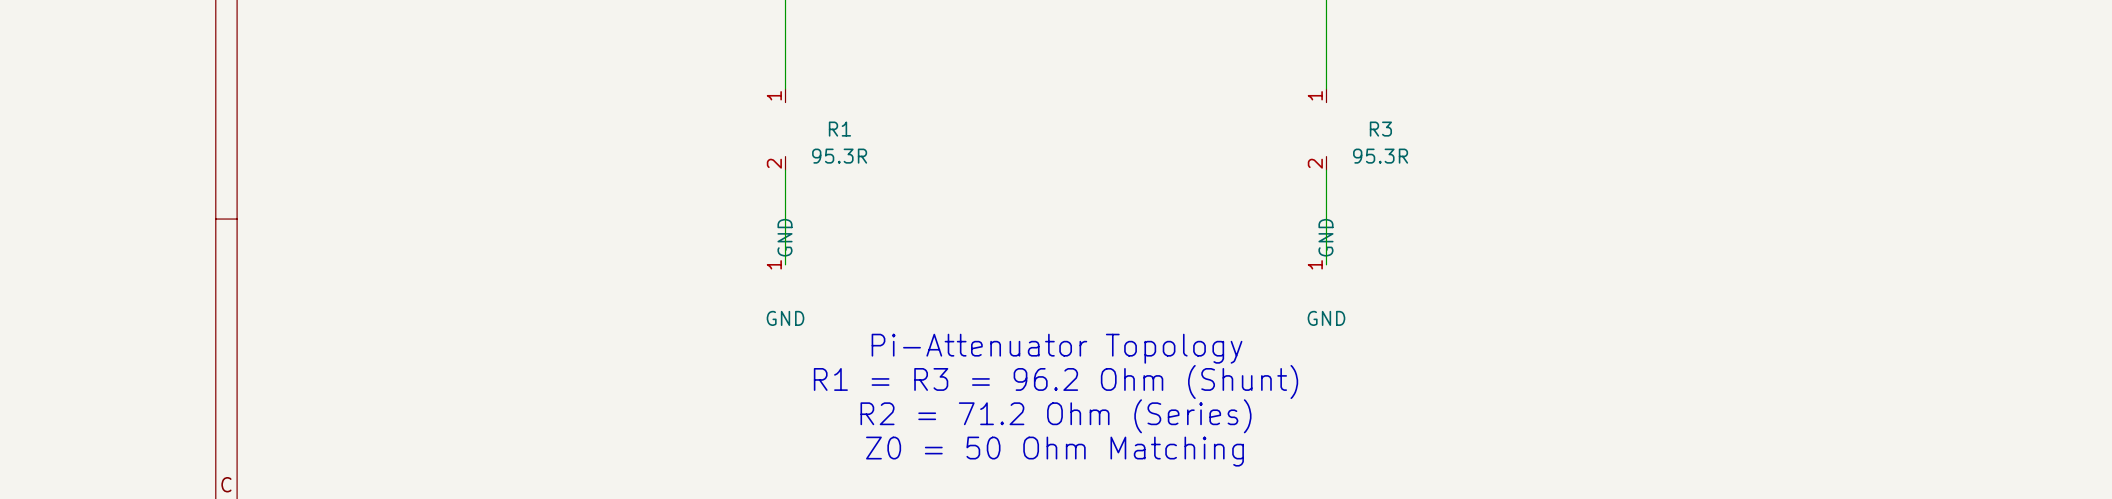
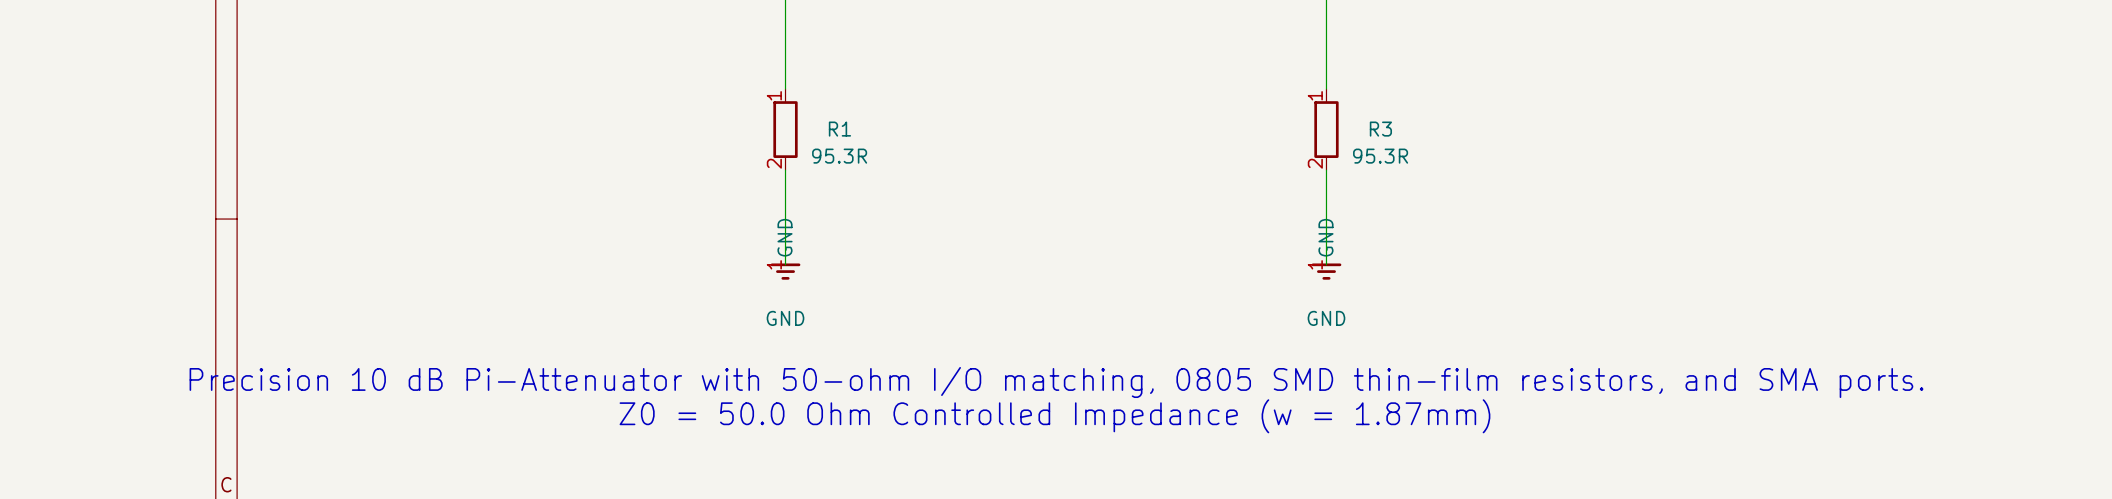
R1 symbol: [785, 89, 786, 171] -> [773, 89, 798, 171]
R3 symbol: [1326, 89, 1327, 171] -> [1314, 89, 1339, 171]
power symbol shape: [766, 218, 805, 326] -> [770, 263, 801, 280]
power symbol shape: [1307, 218, 1346, 326] -> [1311, 263, 1342, 280]
text: Pi-Attenuator Topology (1057, 348) -> none
text: R1 = R3 = 96.2 Ohm (Shunt) (1055, 381) -> Precision 10 dB Pi-Attenuator with 50-ohm I/O matching, 0805 SMD thin-film resistors, and SMA ports. (1056, 382)
text: R2 = 71.2 Ohm (Series) (1055, 416) -> Z0 = 50.0 Ohm Controlled Impedance (w = 1.87mm) (1054, 416)
text: Z0 = 50 Ohm Matching (1054, 451) -> none

